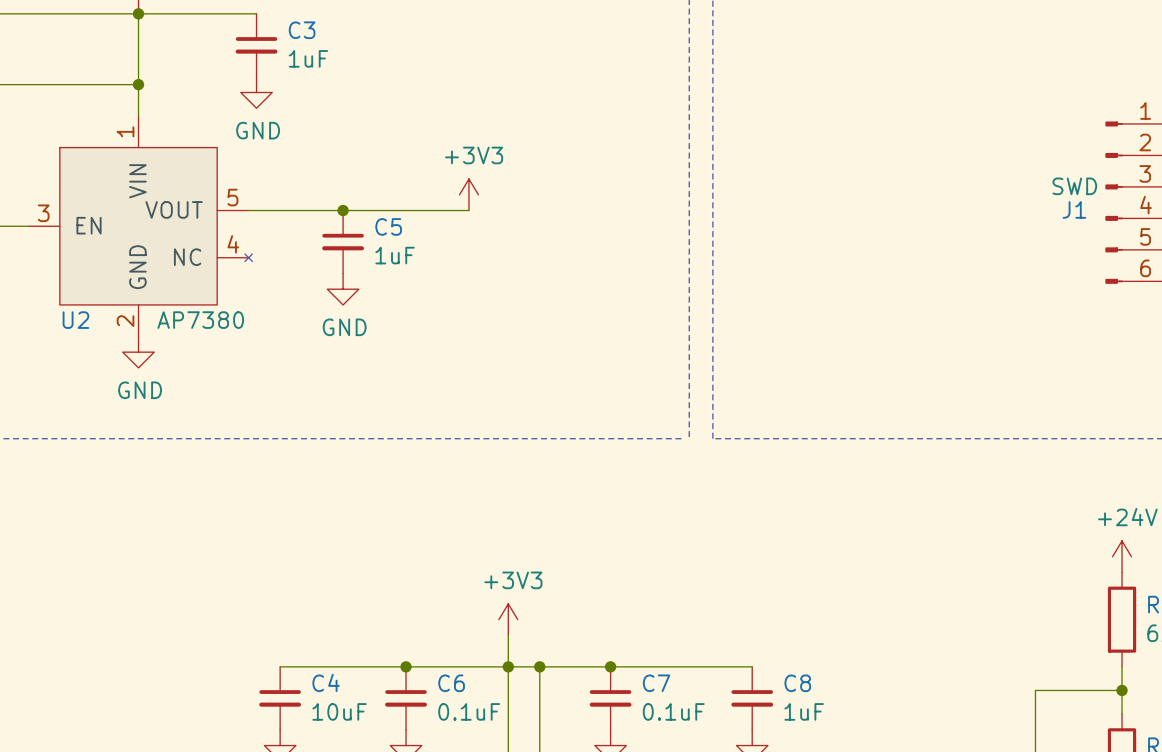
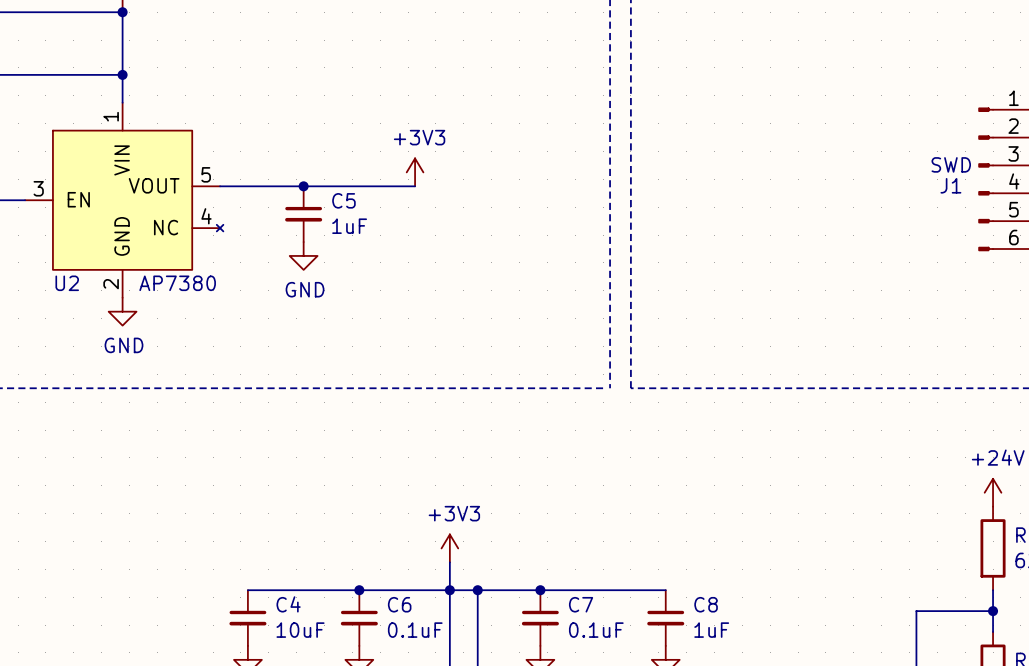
wire: (138, 13) (256, 13) -> none
C3: 1uF (256, 45) -> none
power symbol: GND (256, 92) -> none

